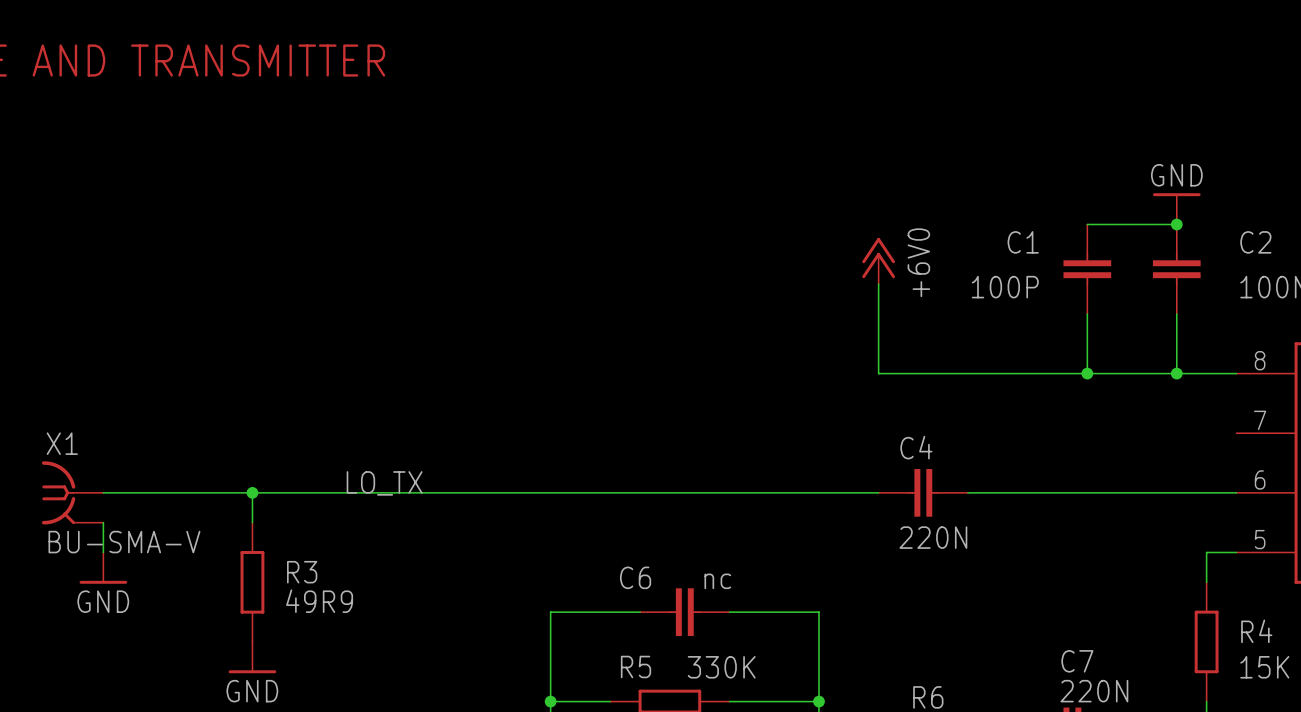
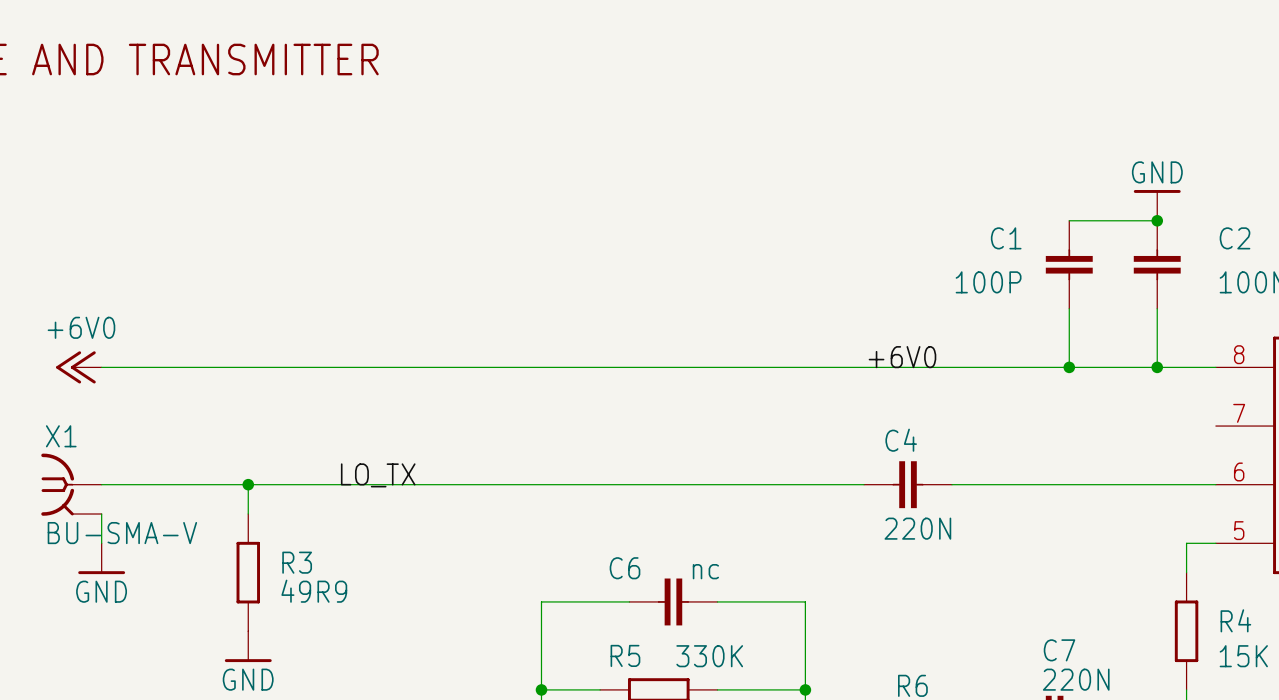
power symbol: +6V0 (878, 261) -> none
wire: (878, 284) (878, 373) -> (101, 367) (864, 367)
label: none -> +6V0 (902, 357)
power symbol: none -> +6V0 (78, 367)

